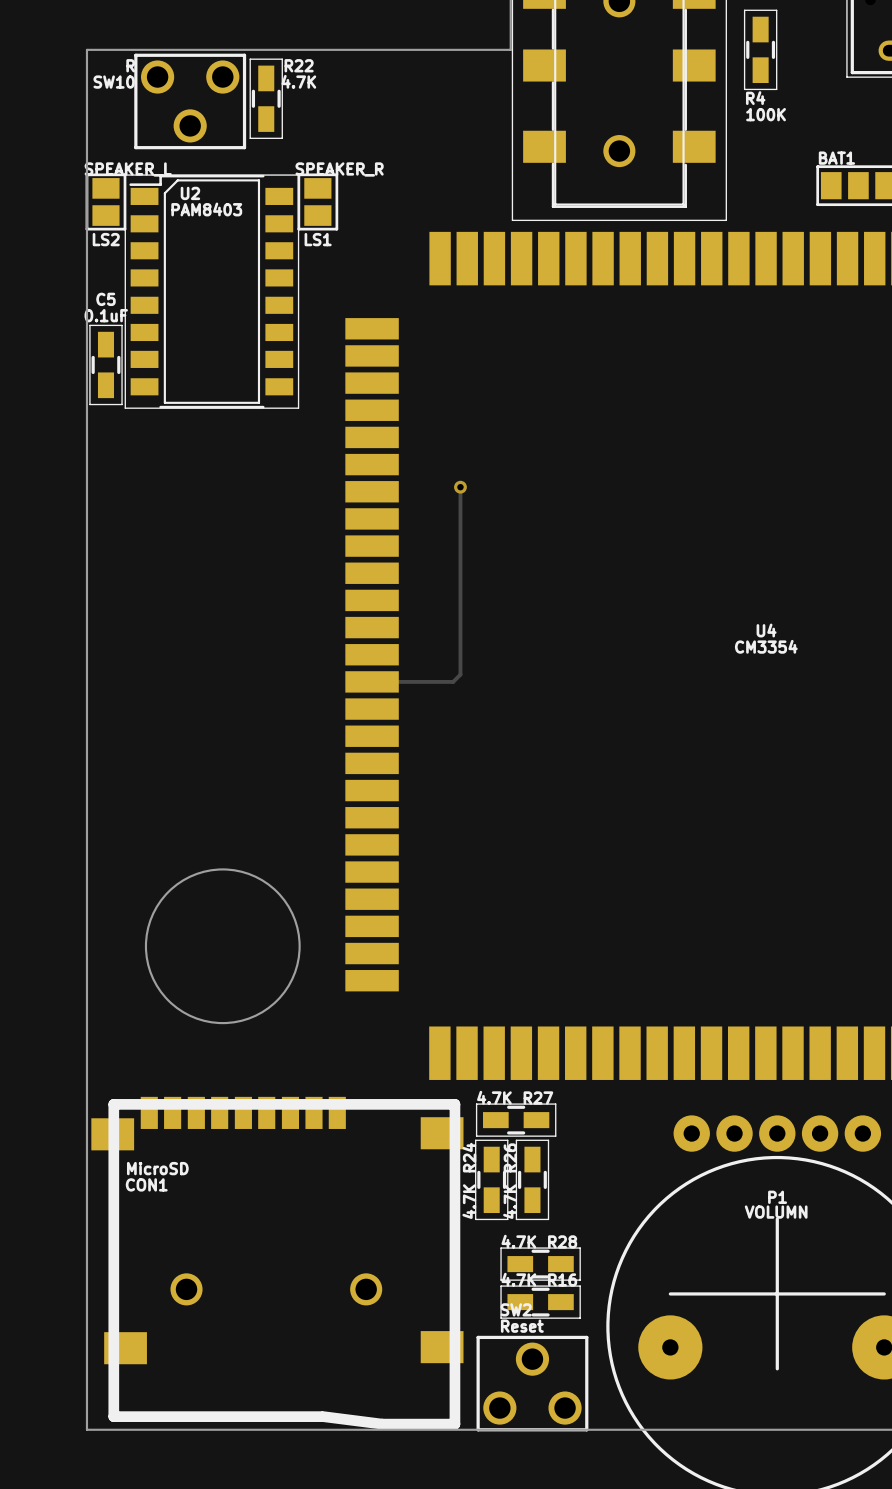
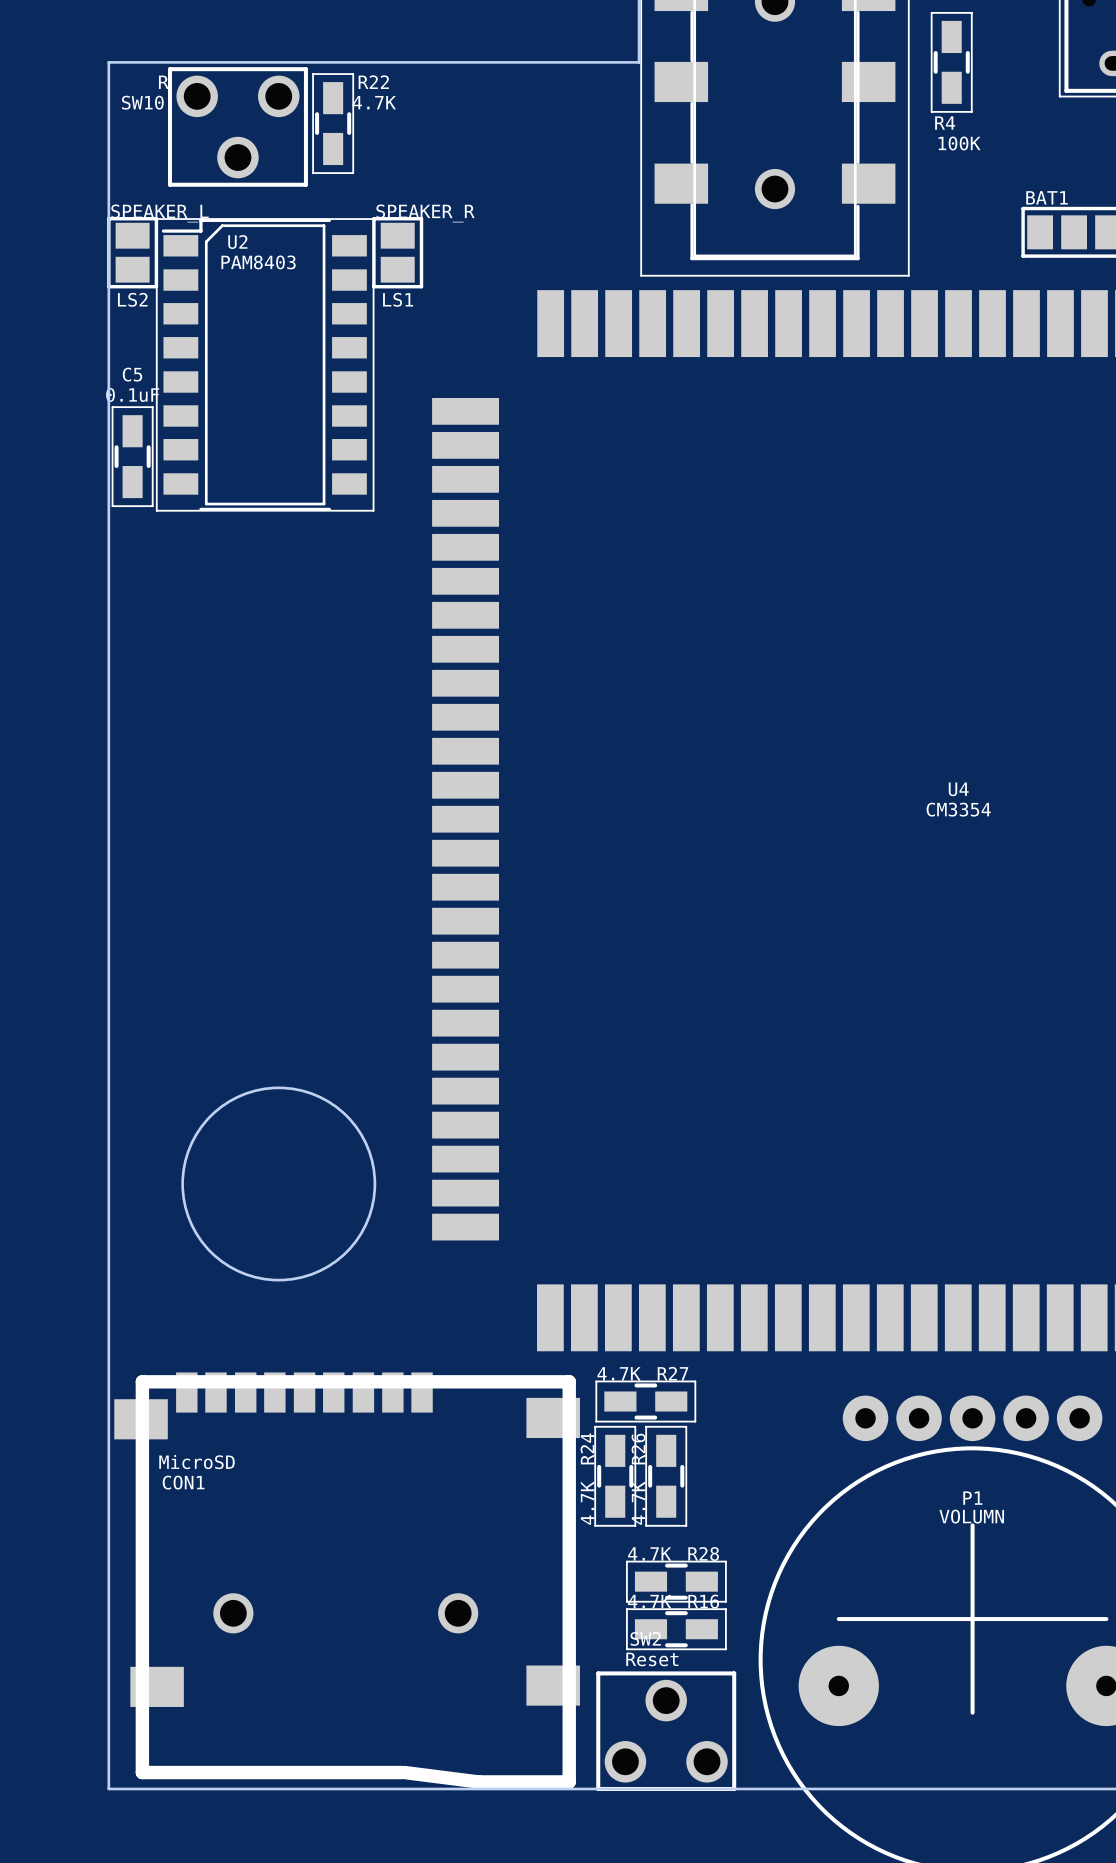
track: (460, 487) (460, 674) (453, 681) (372, 681) -> none
via: (460, 487) -> none

